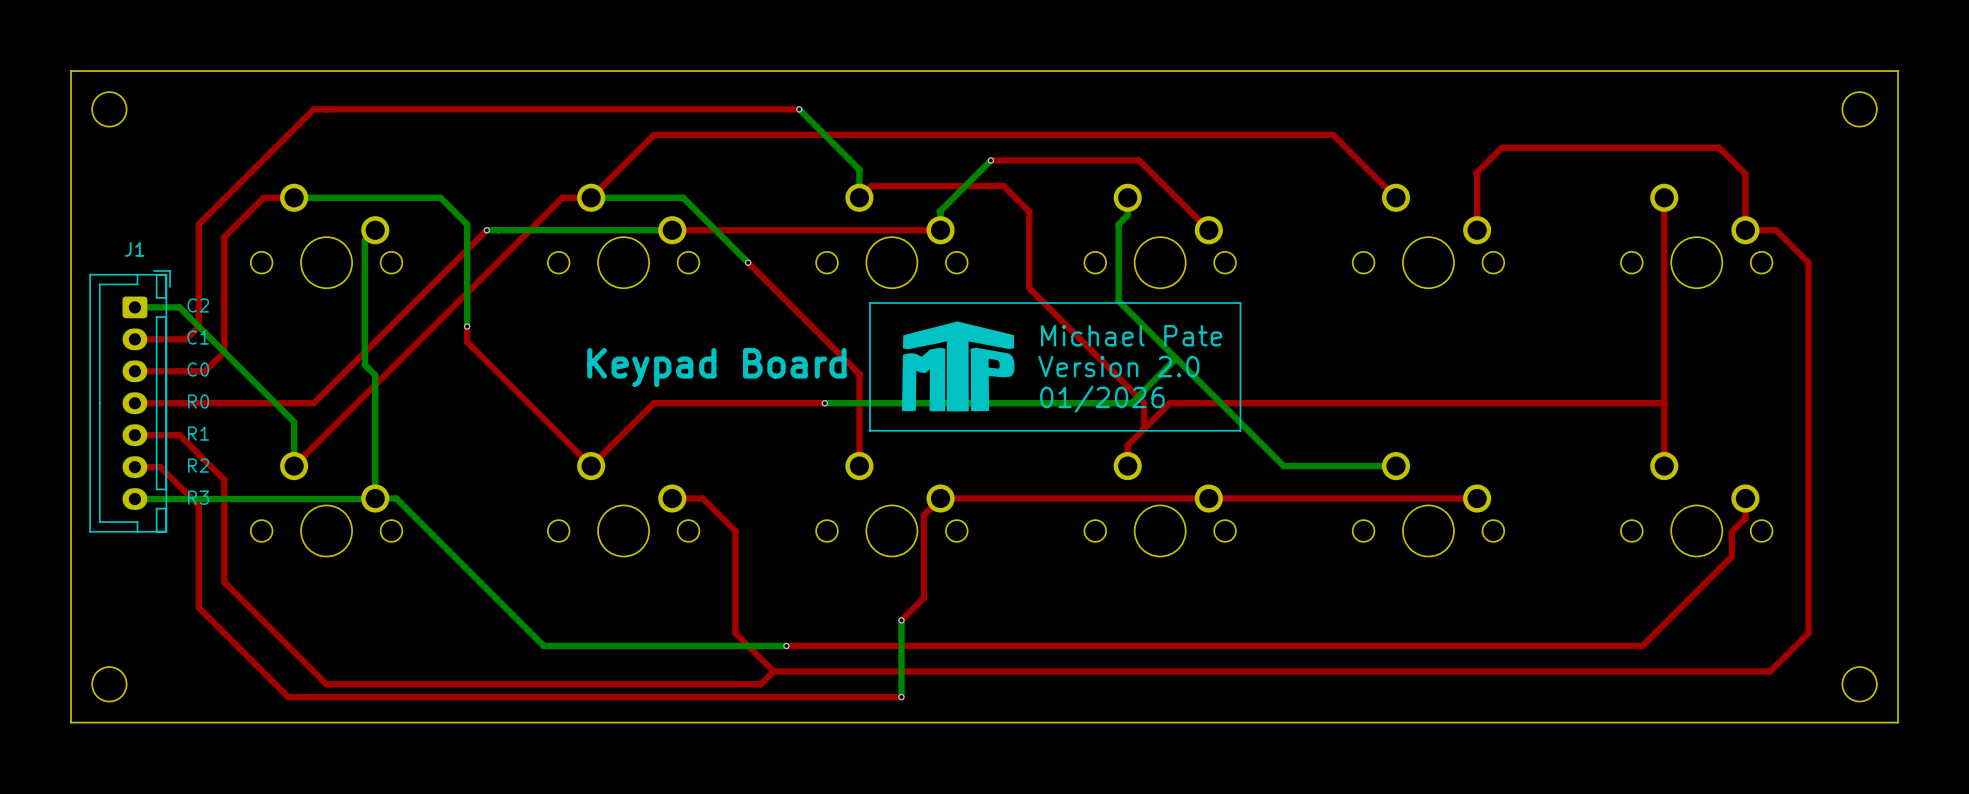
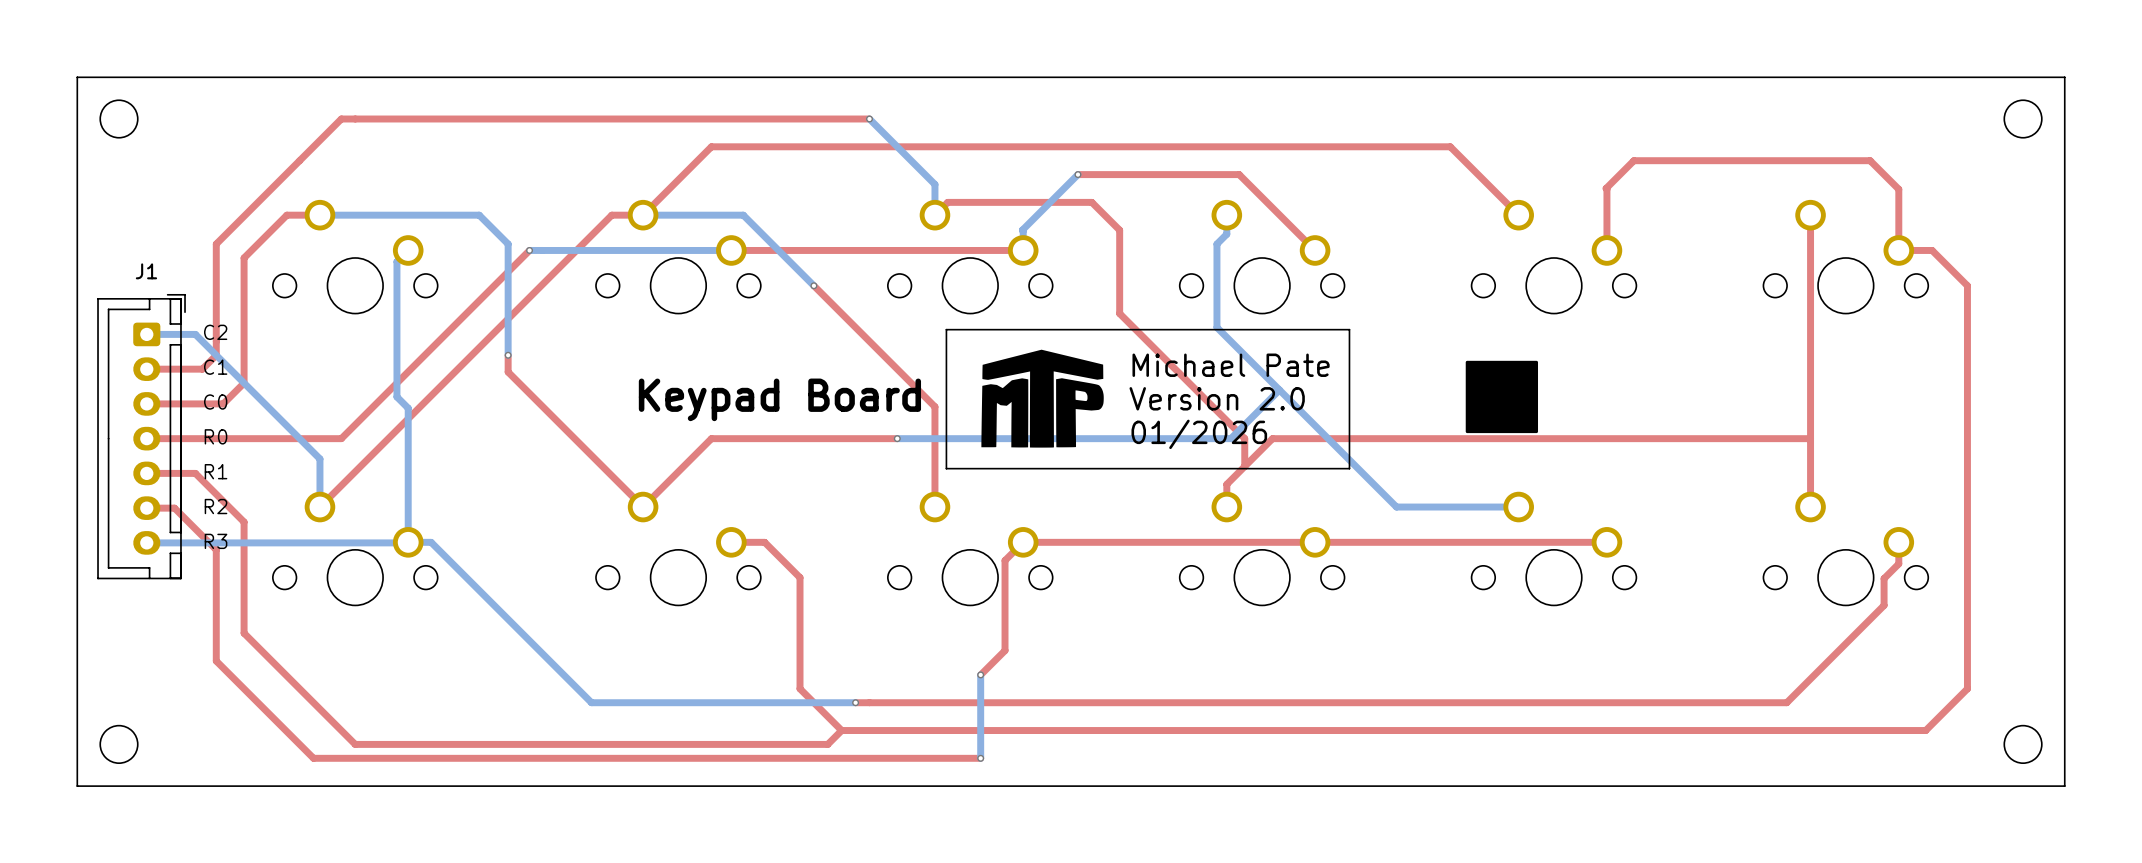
drawing: none -> [1465, 360, 1539, 434]

